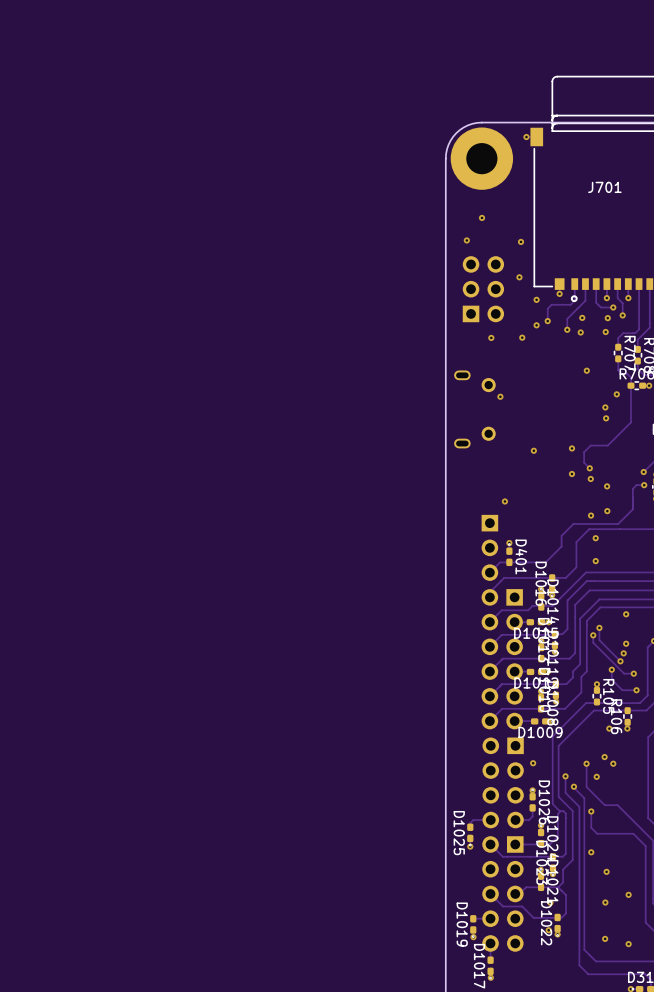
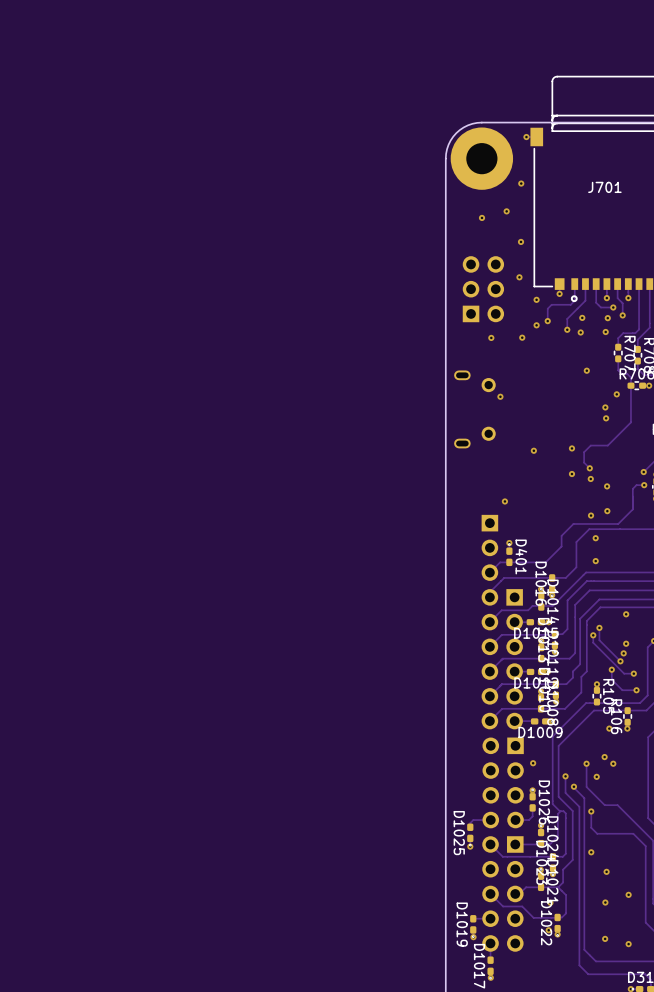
via: none -> (521, 183)
via: none -> (506, 211)
via: (466, 240) -> none

